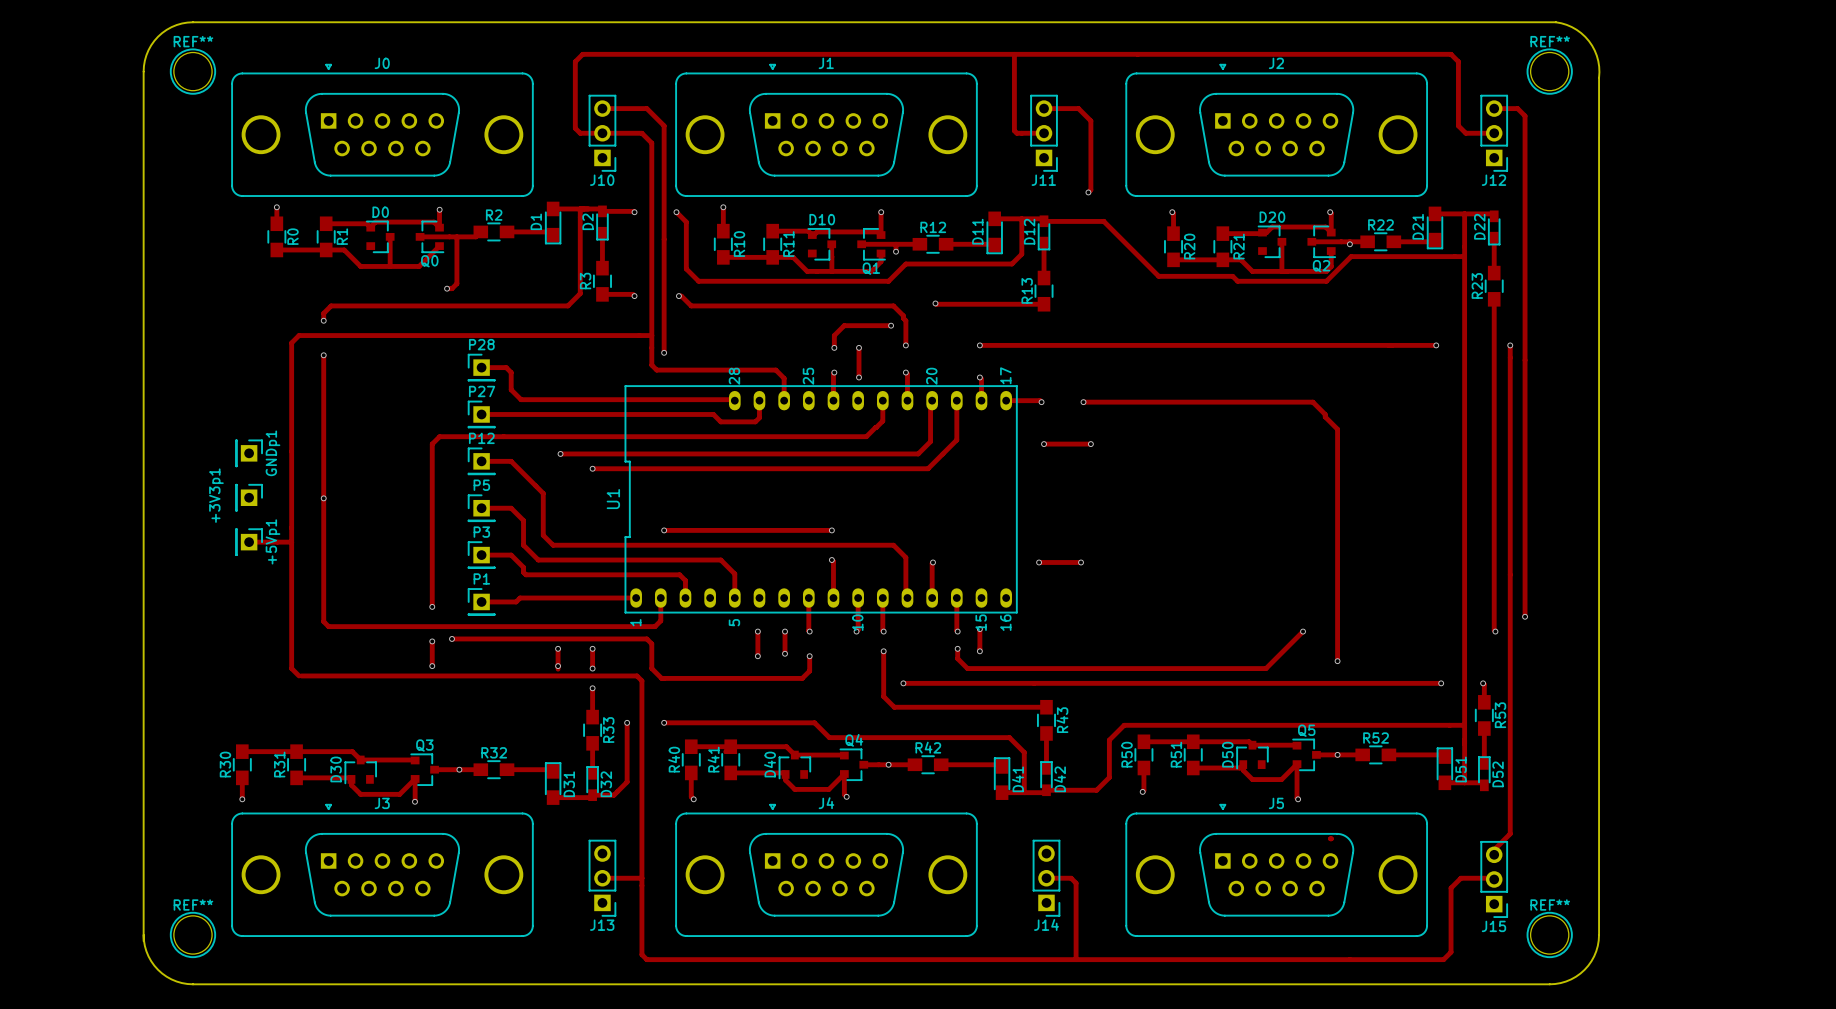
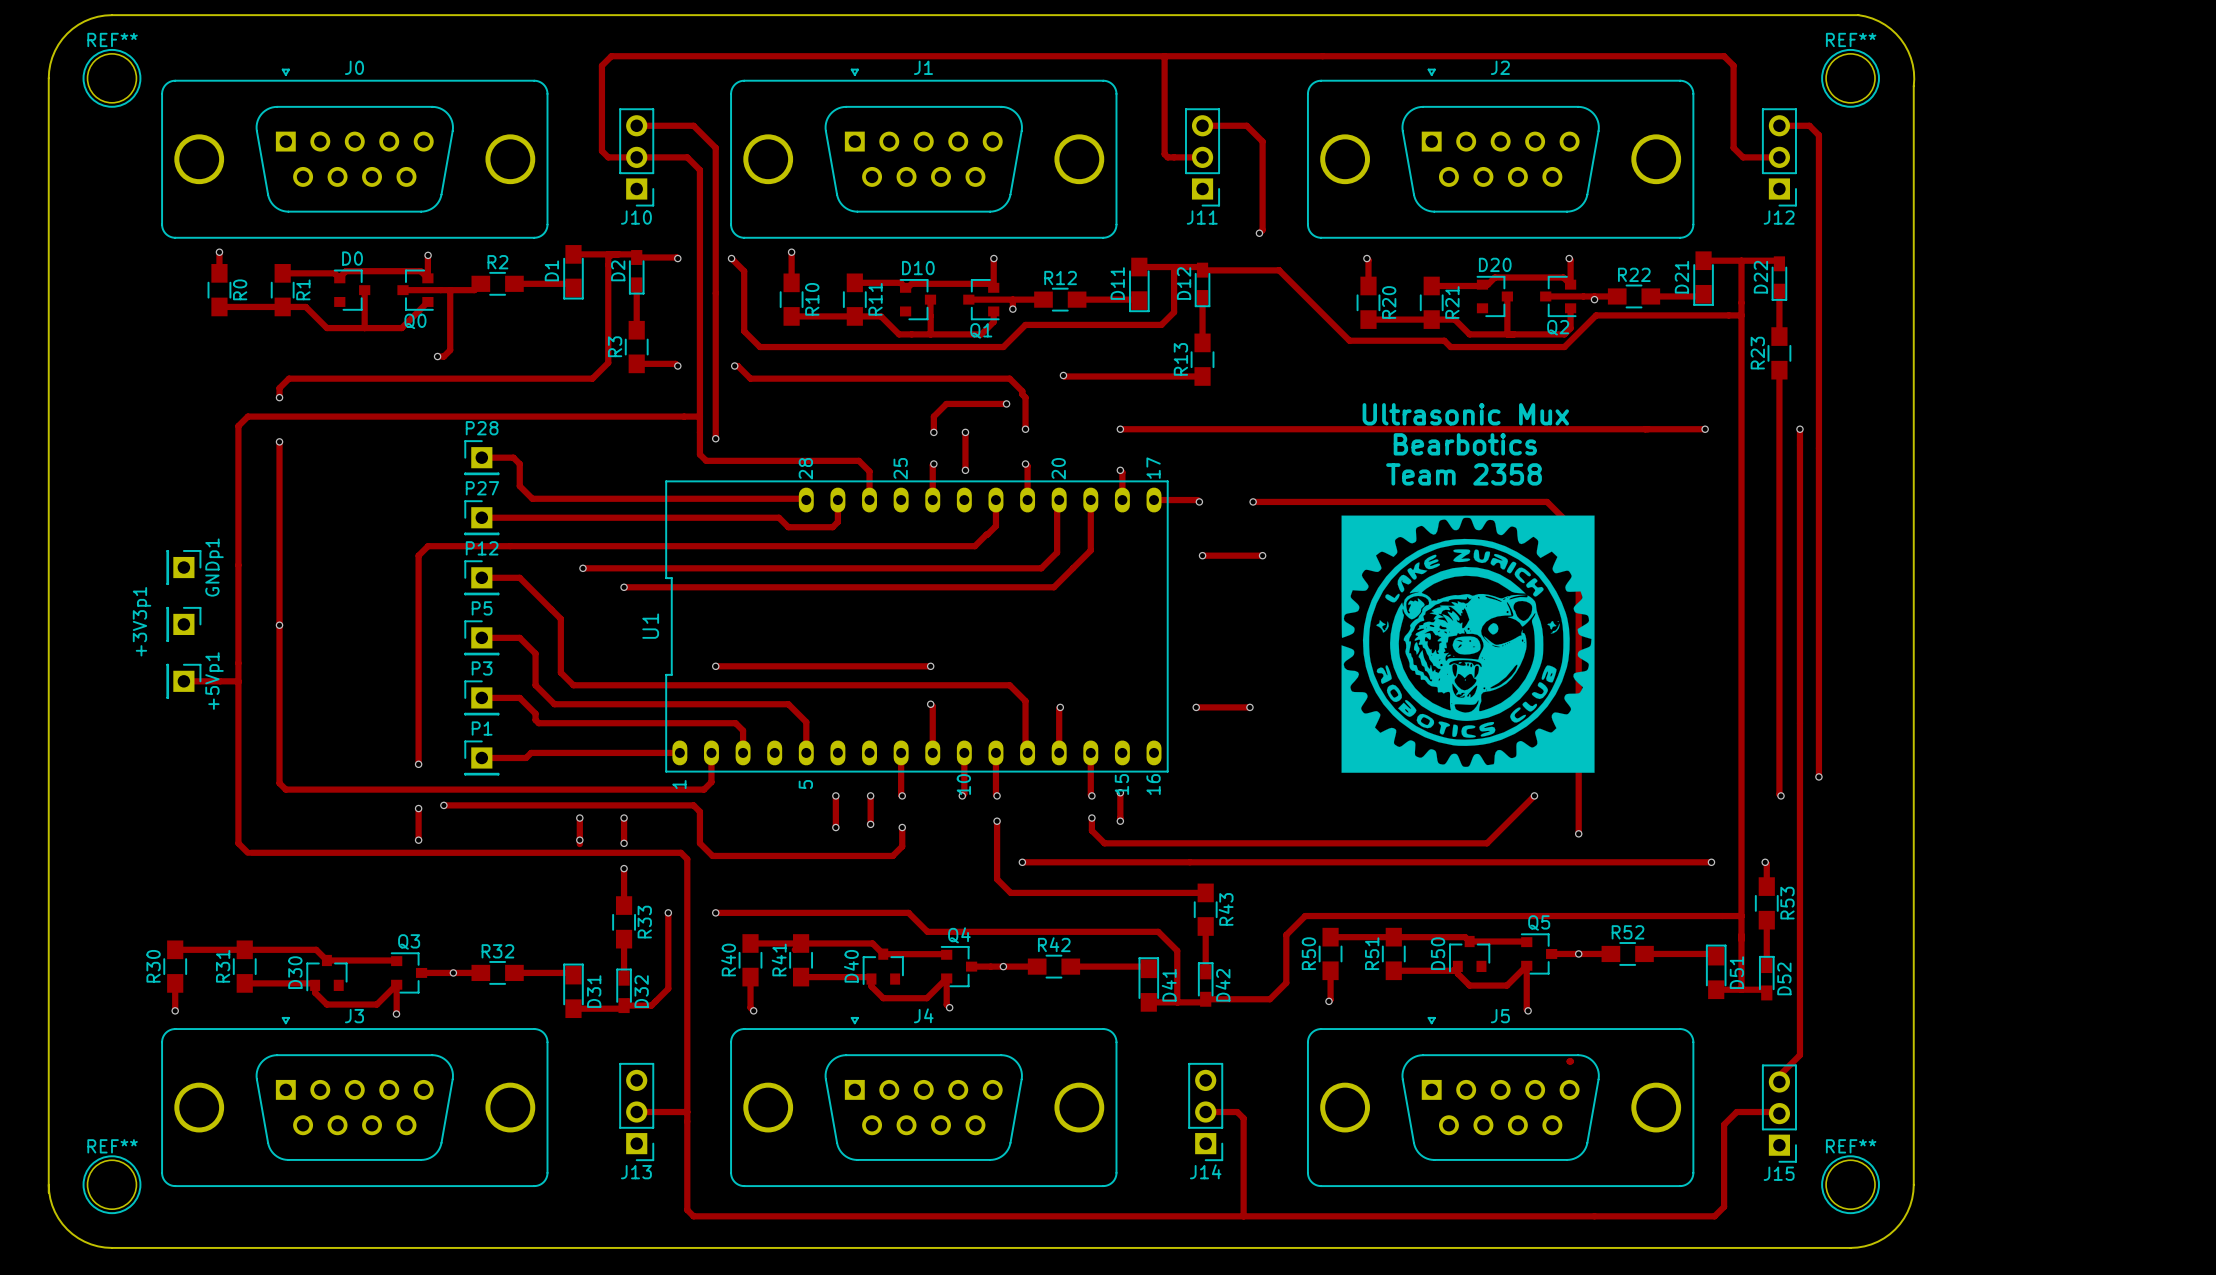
text: none -> Ultrasonic Mux (1465, 414)
text: none -> Bearbotics (1465, 444)
text: none -> Team 2358 (1464, 474)
drawing: none -> [1341, 515, 1595, 773]

